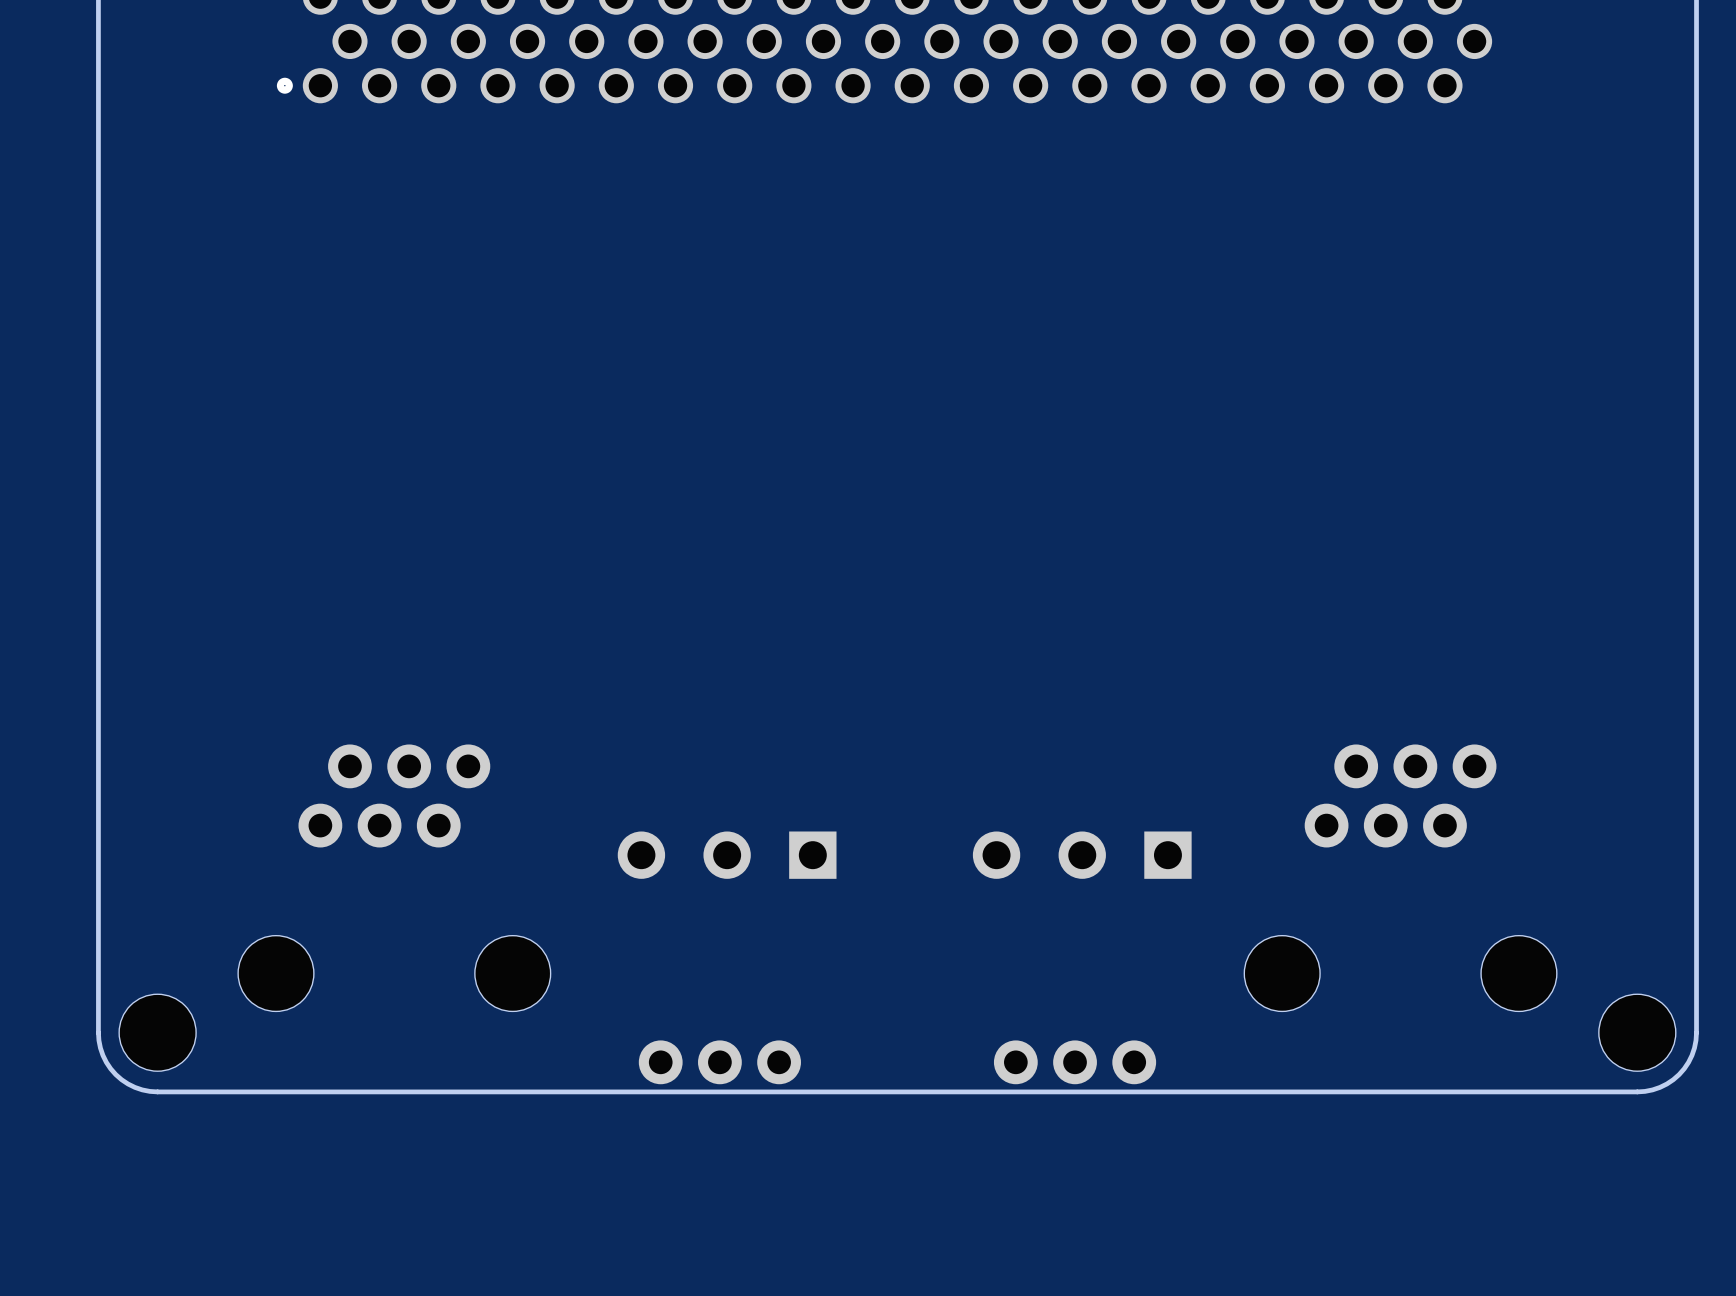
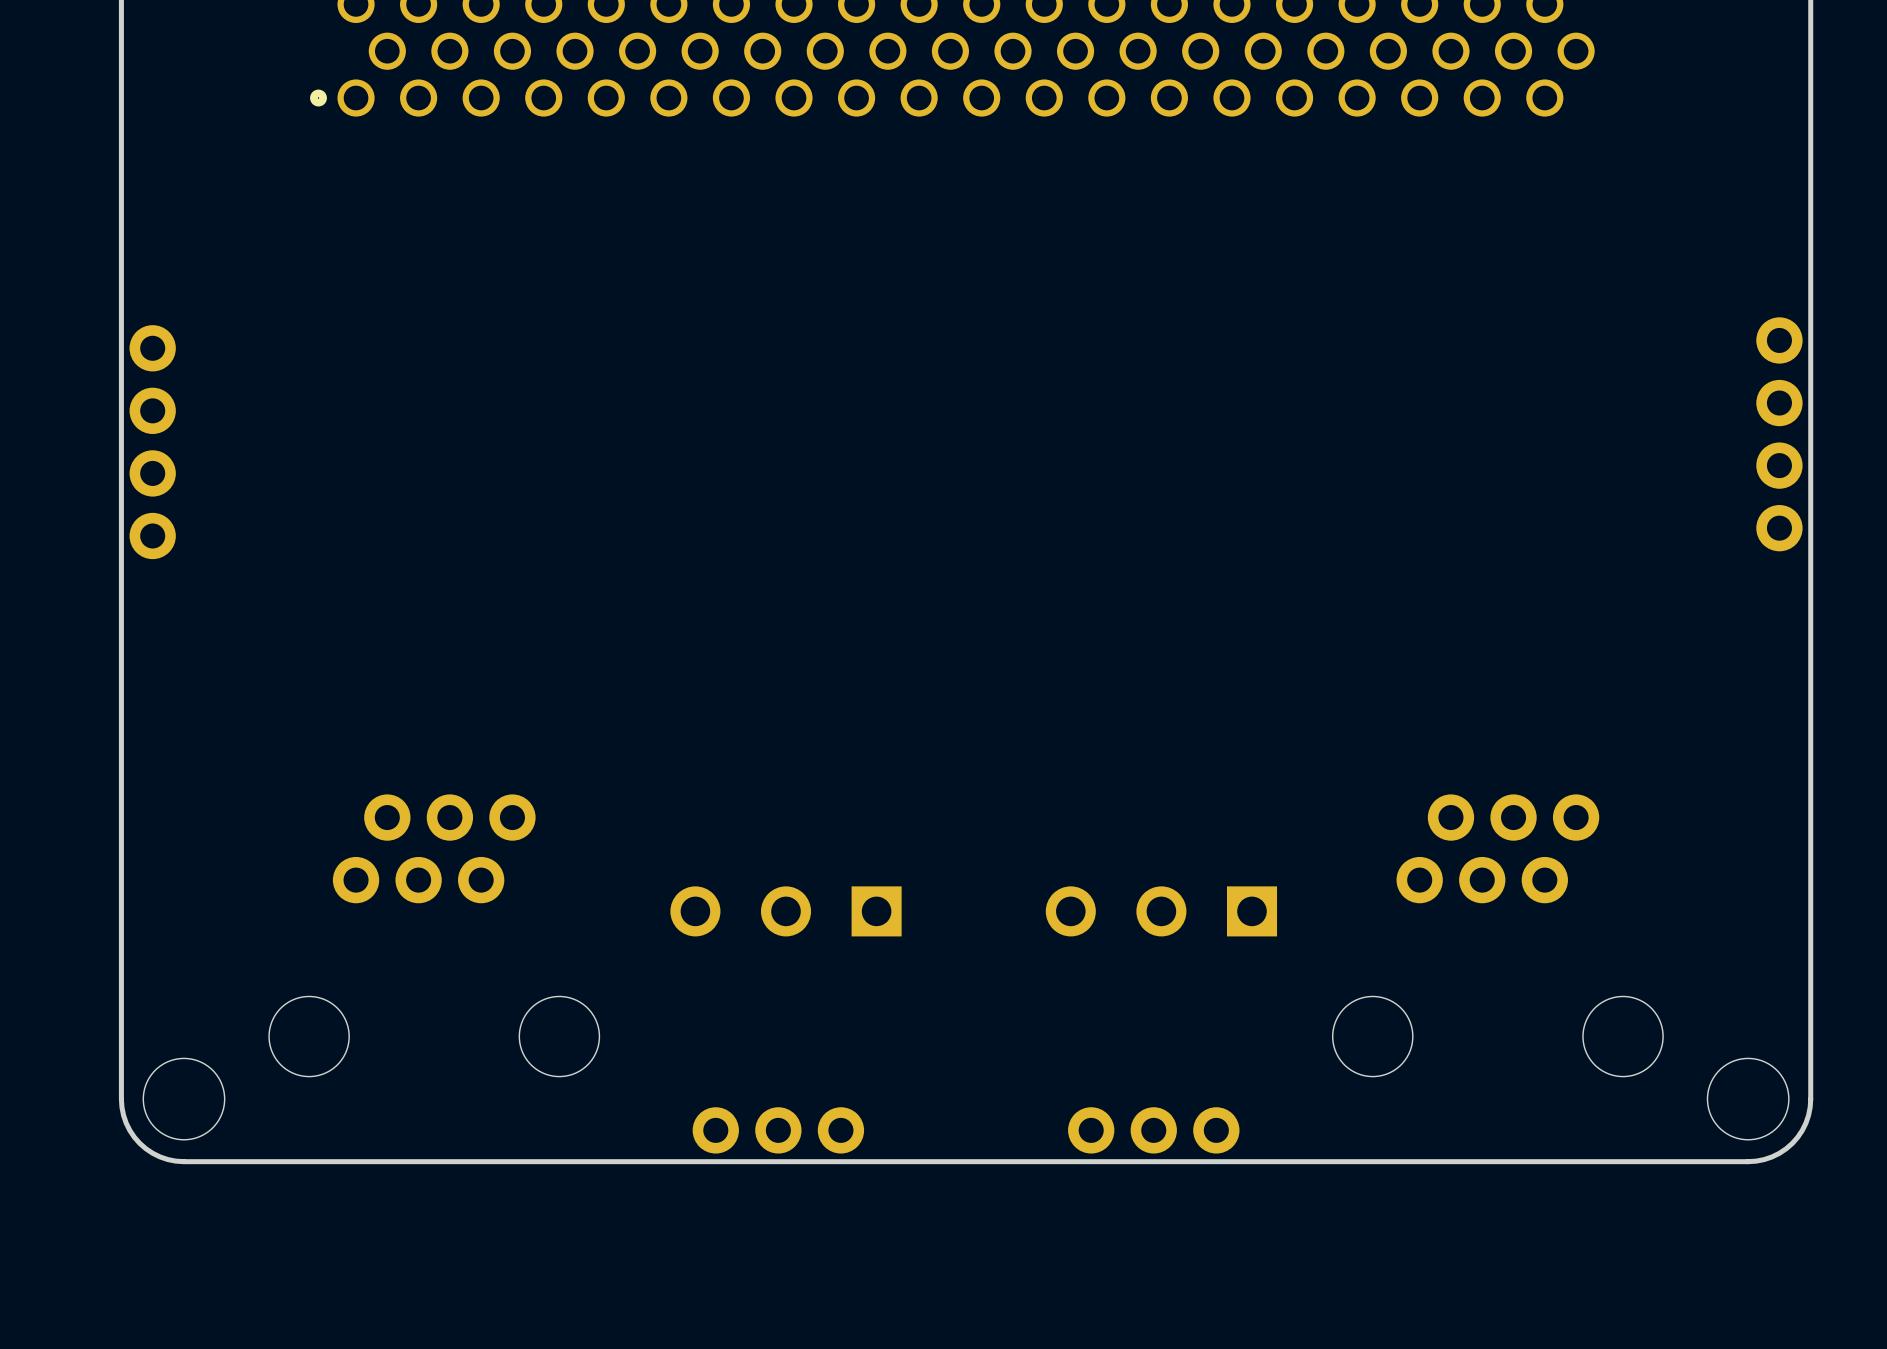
part: none -> (1779, 434)
part: none -> (152, 442)

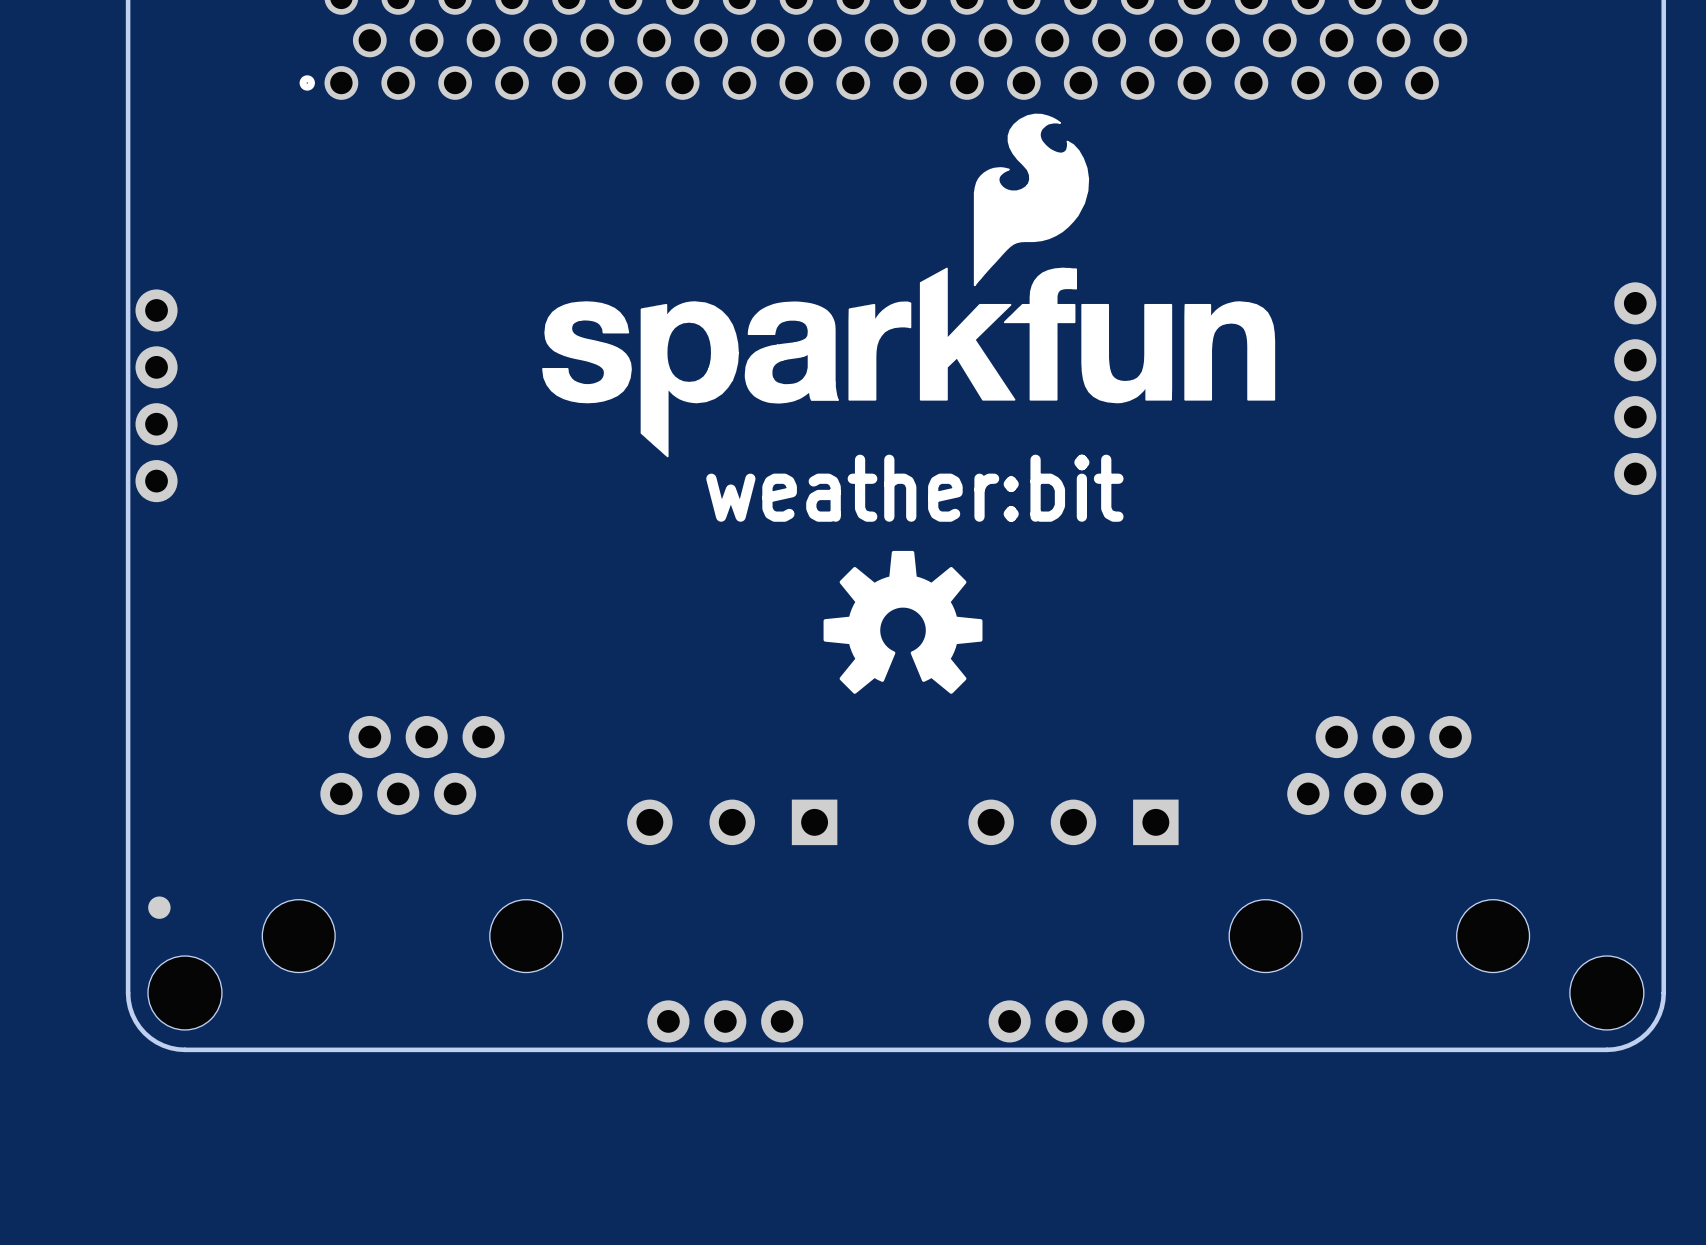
drawing: none -> [542, 113, 1276, 458]
text: none -> weather:bit (914, 488)
drawing: none -> [823, 550, 983, 694]
part: none -> (159, 907)

